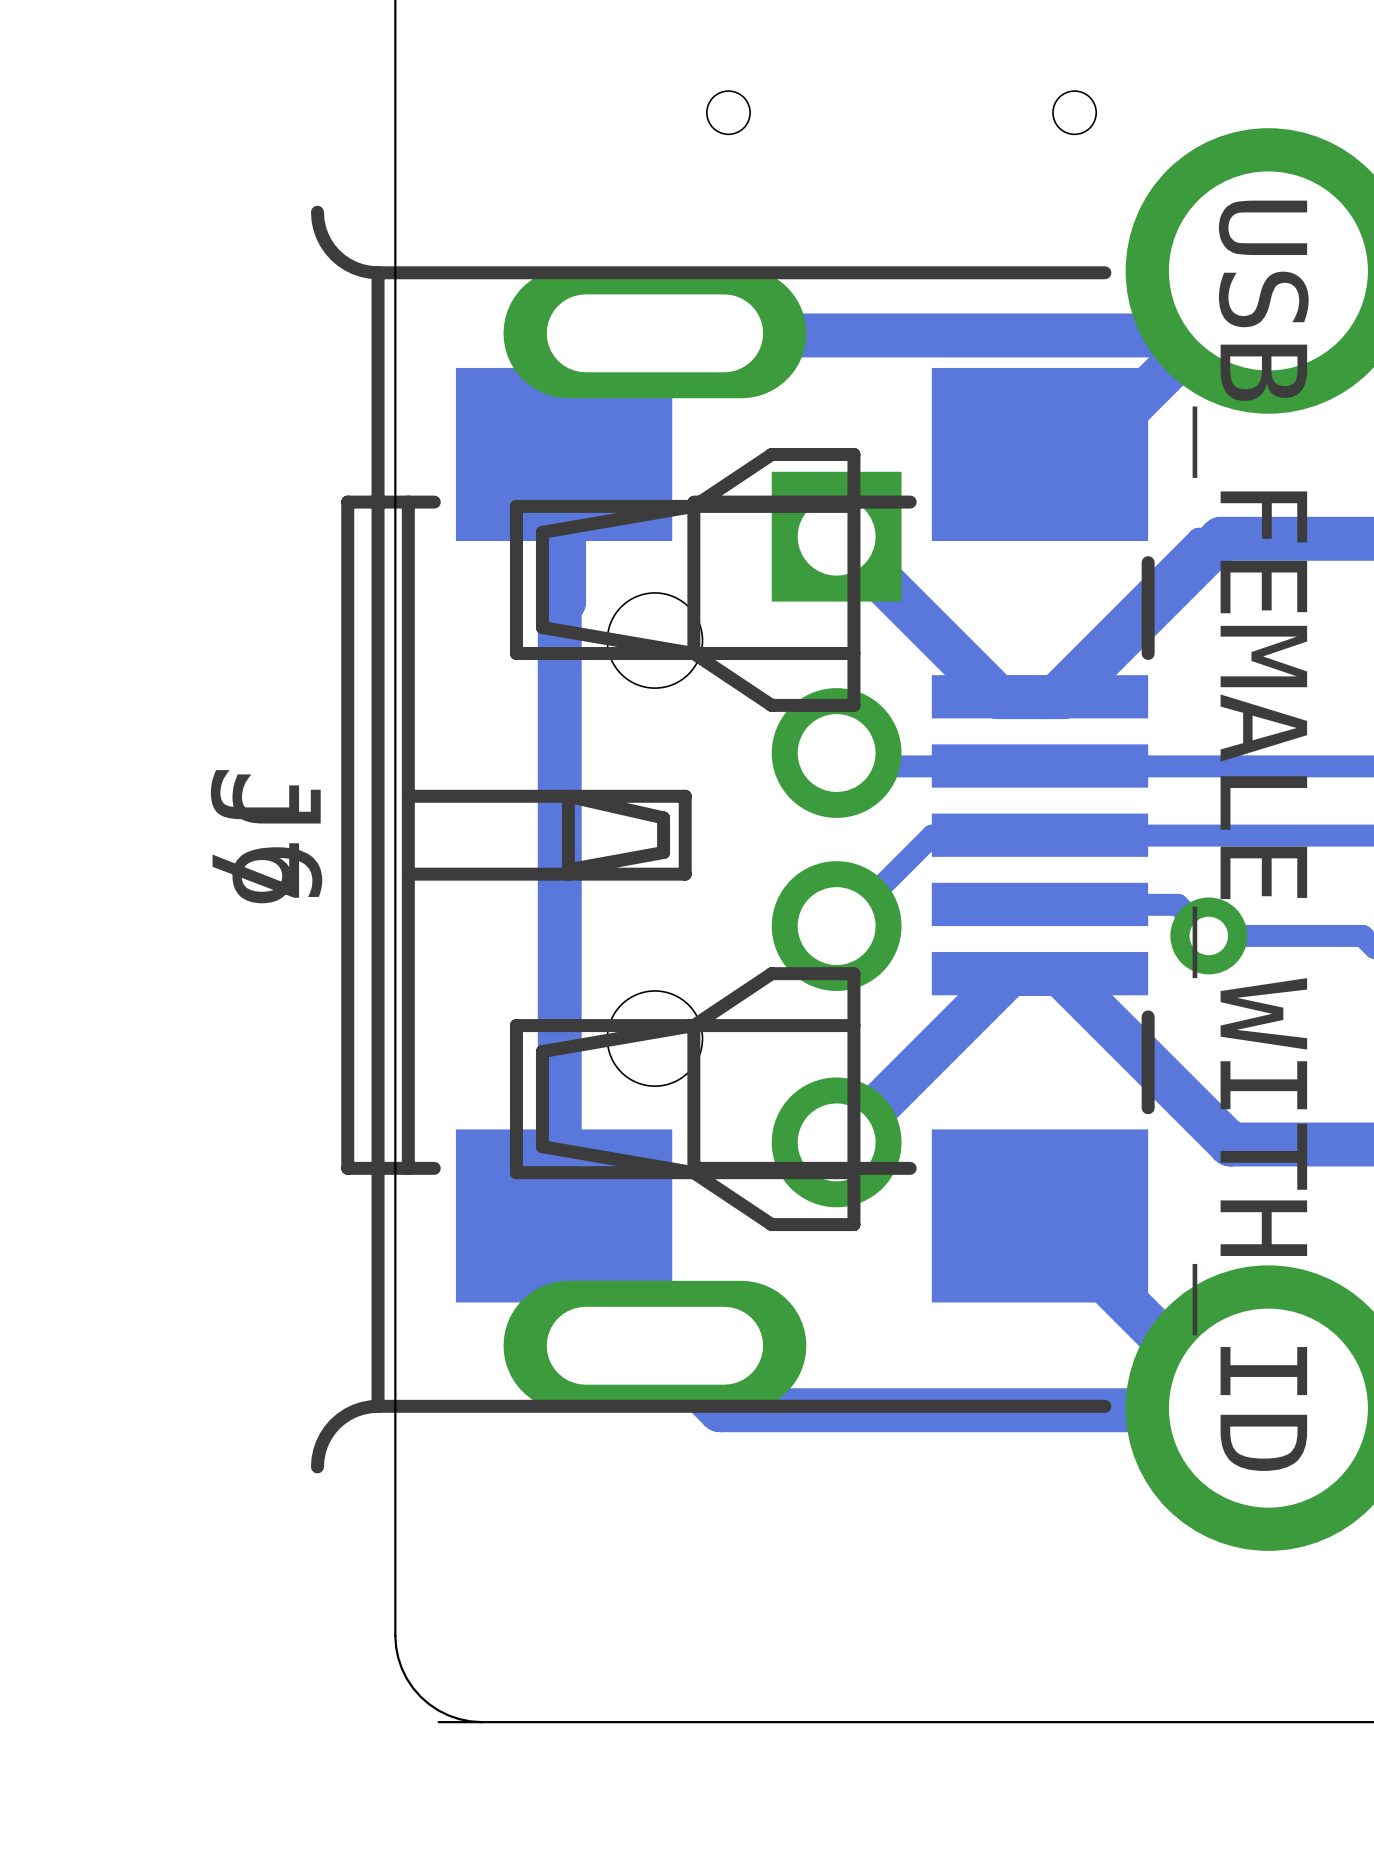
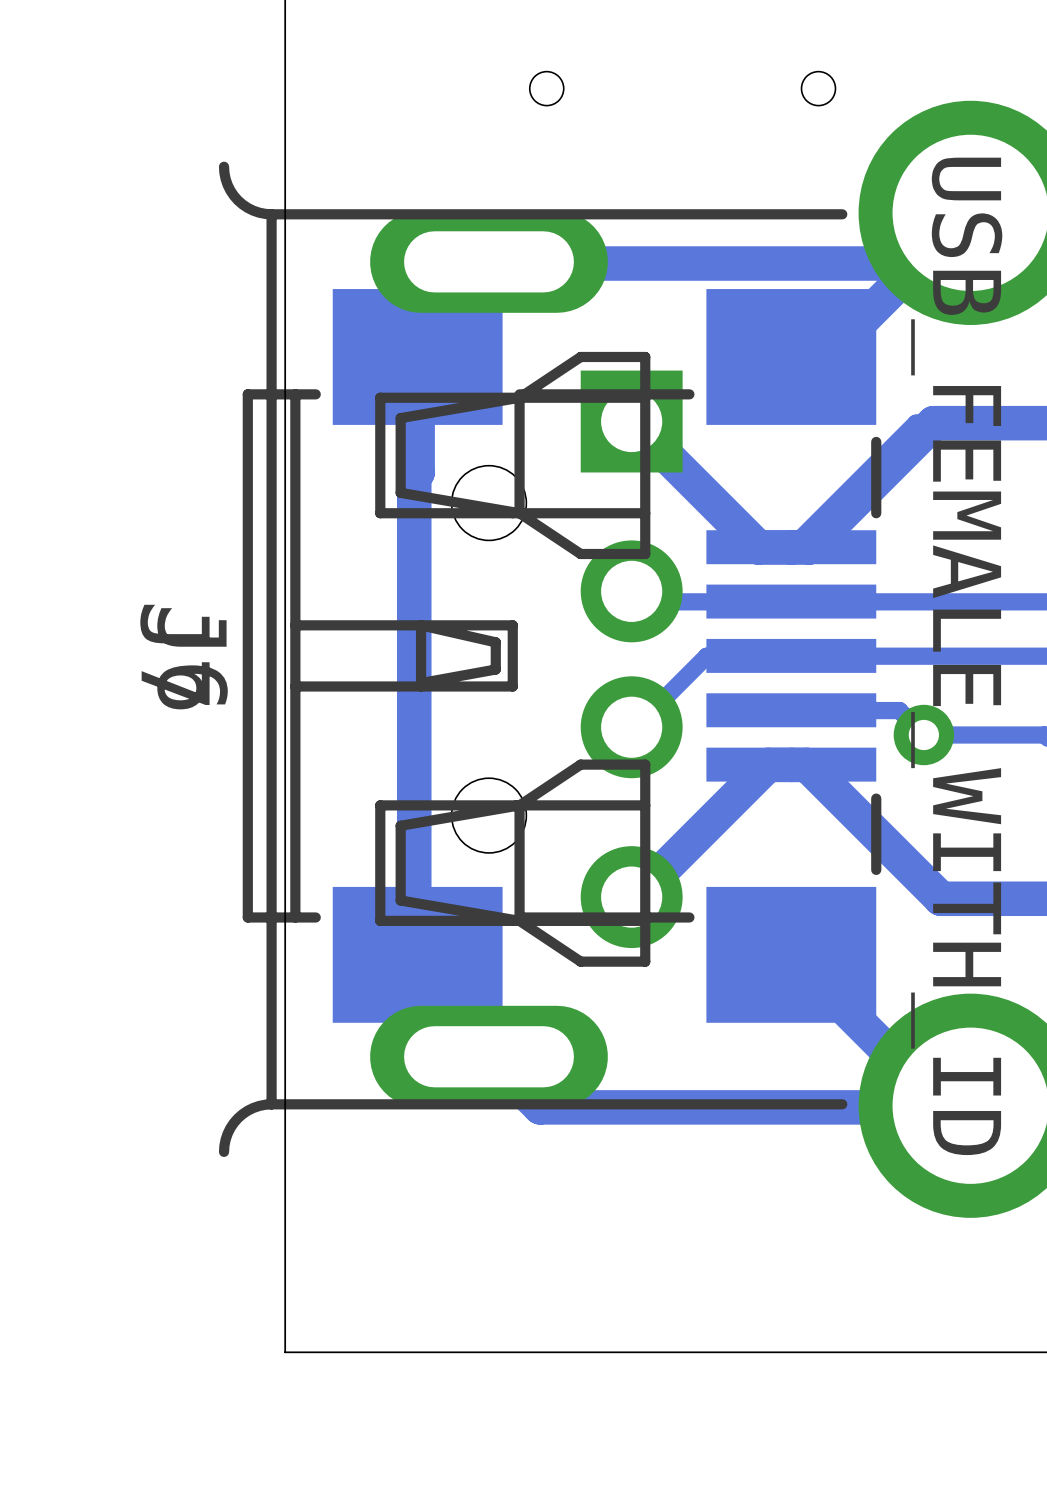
board edge: (395, 1635) (401, 1668) (420, 1696) (448, 1715) (481, 1722) -> (285, 1284) (285, 1352) (319, 1352)

